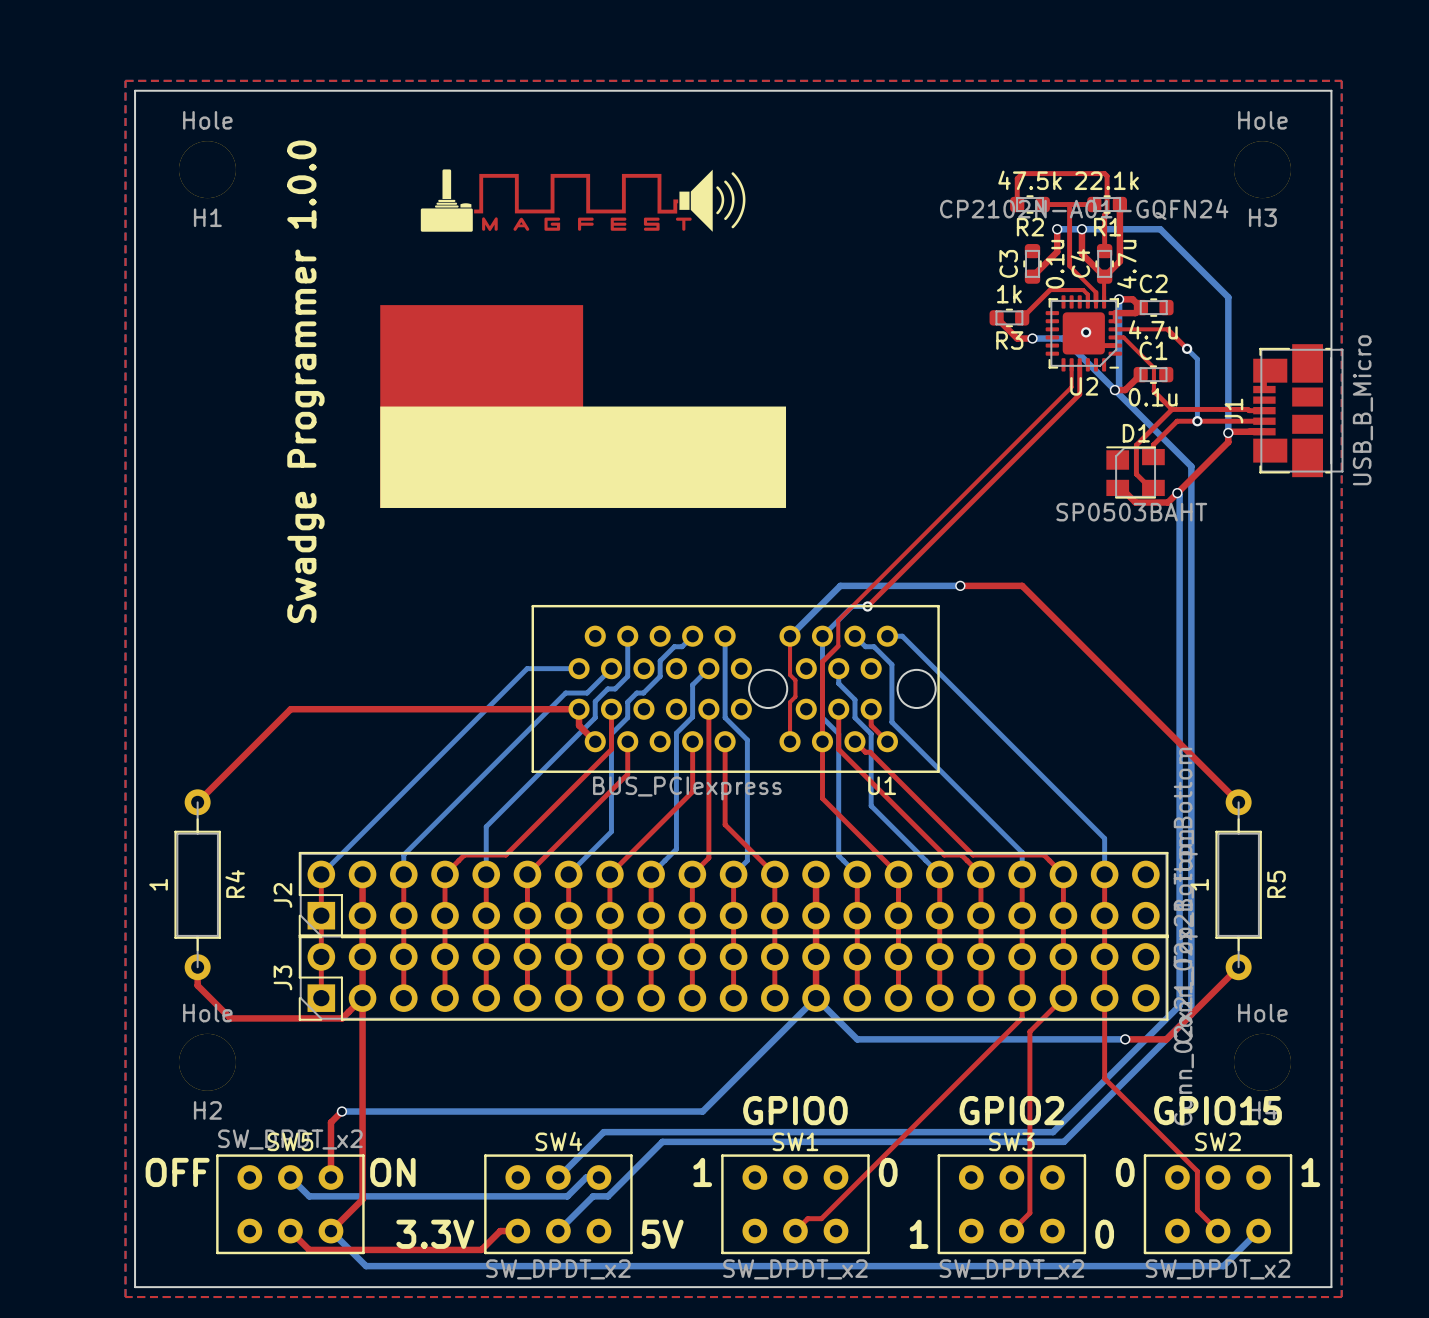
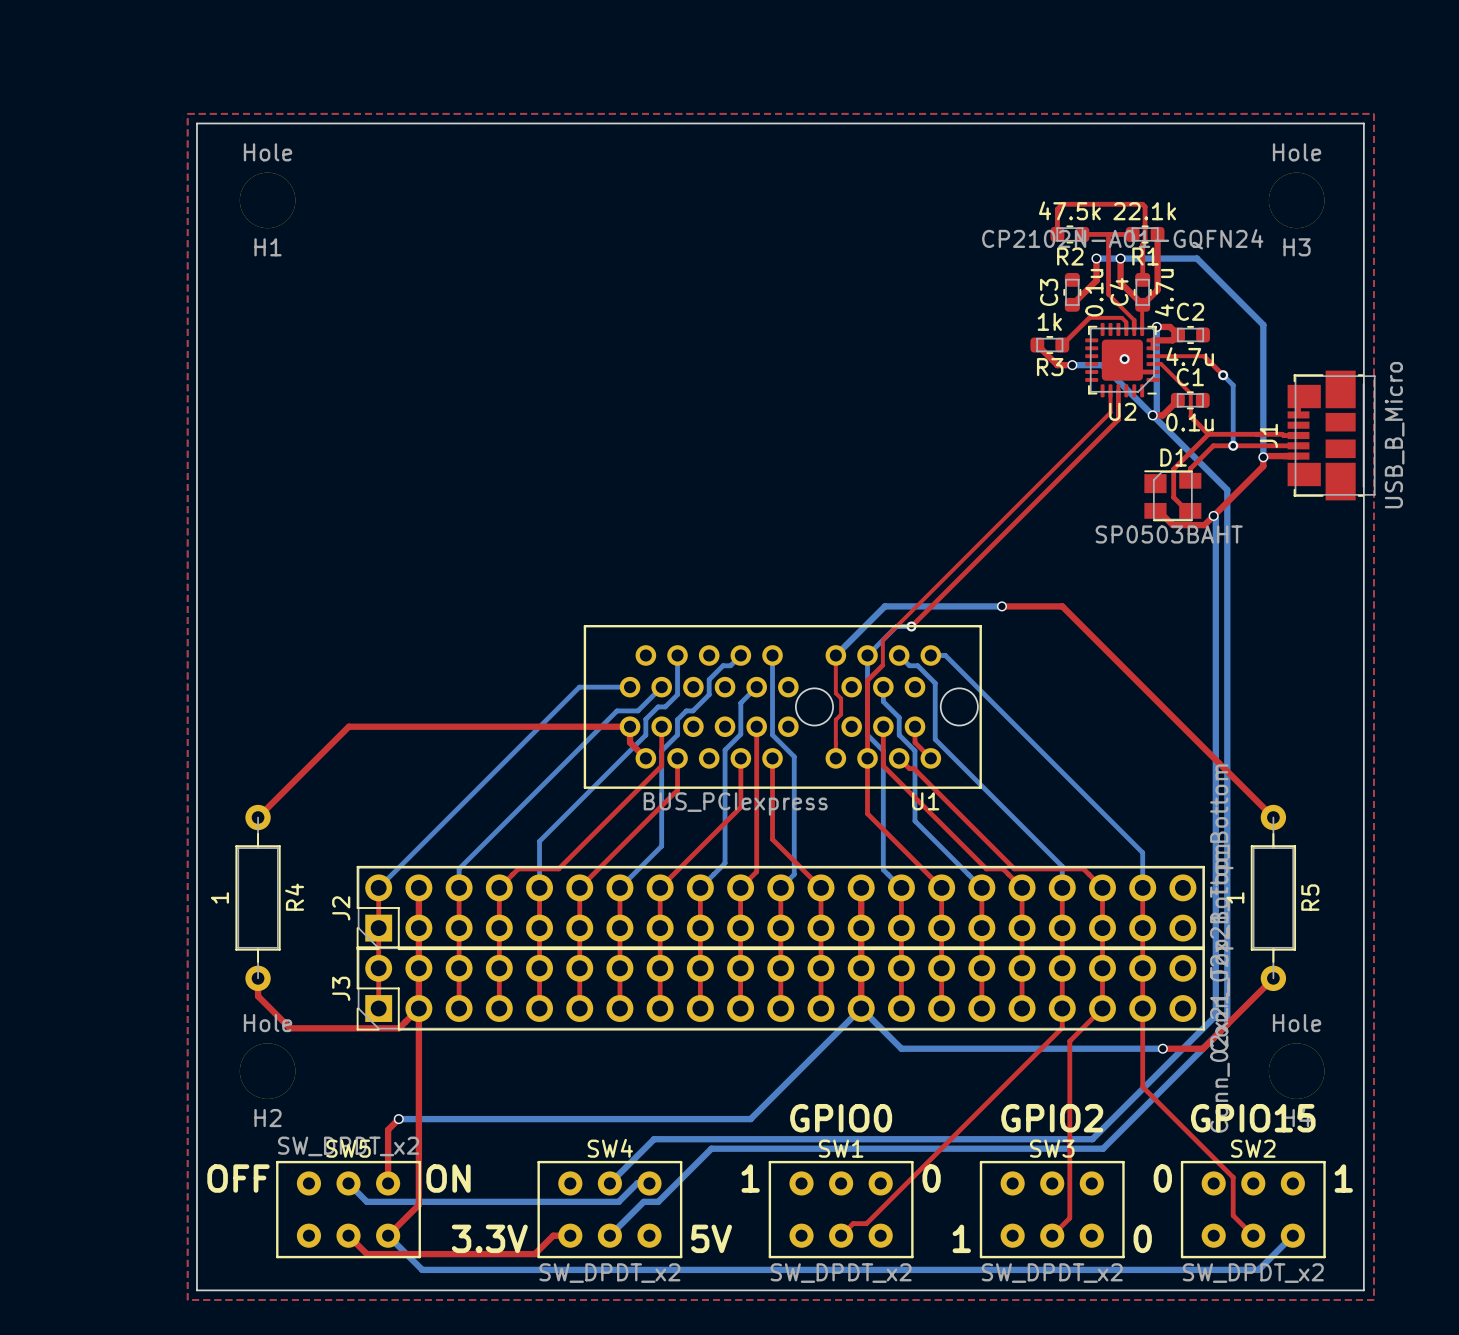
drawing: [420, 169, 746, 232] -> none
drawing: [380, 305, 787, 508] -> none
text: Swadge Programmer 1.0.0 (305, 381) -> none

